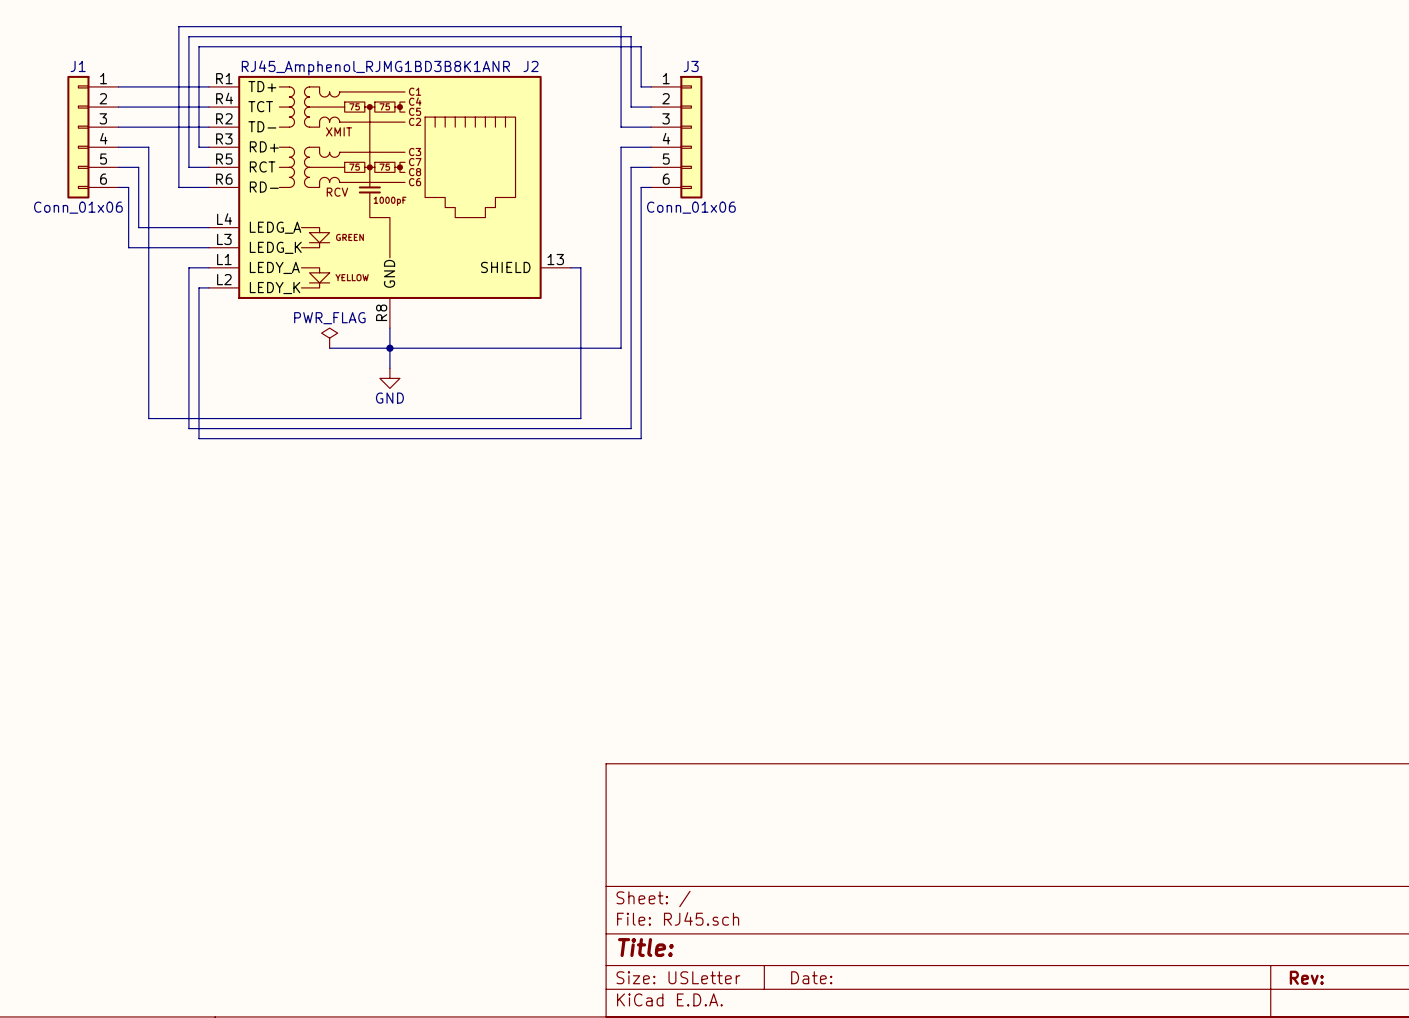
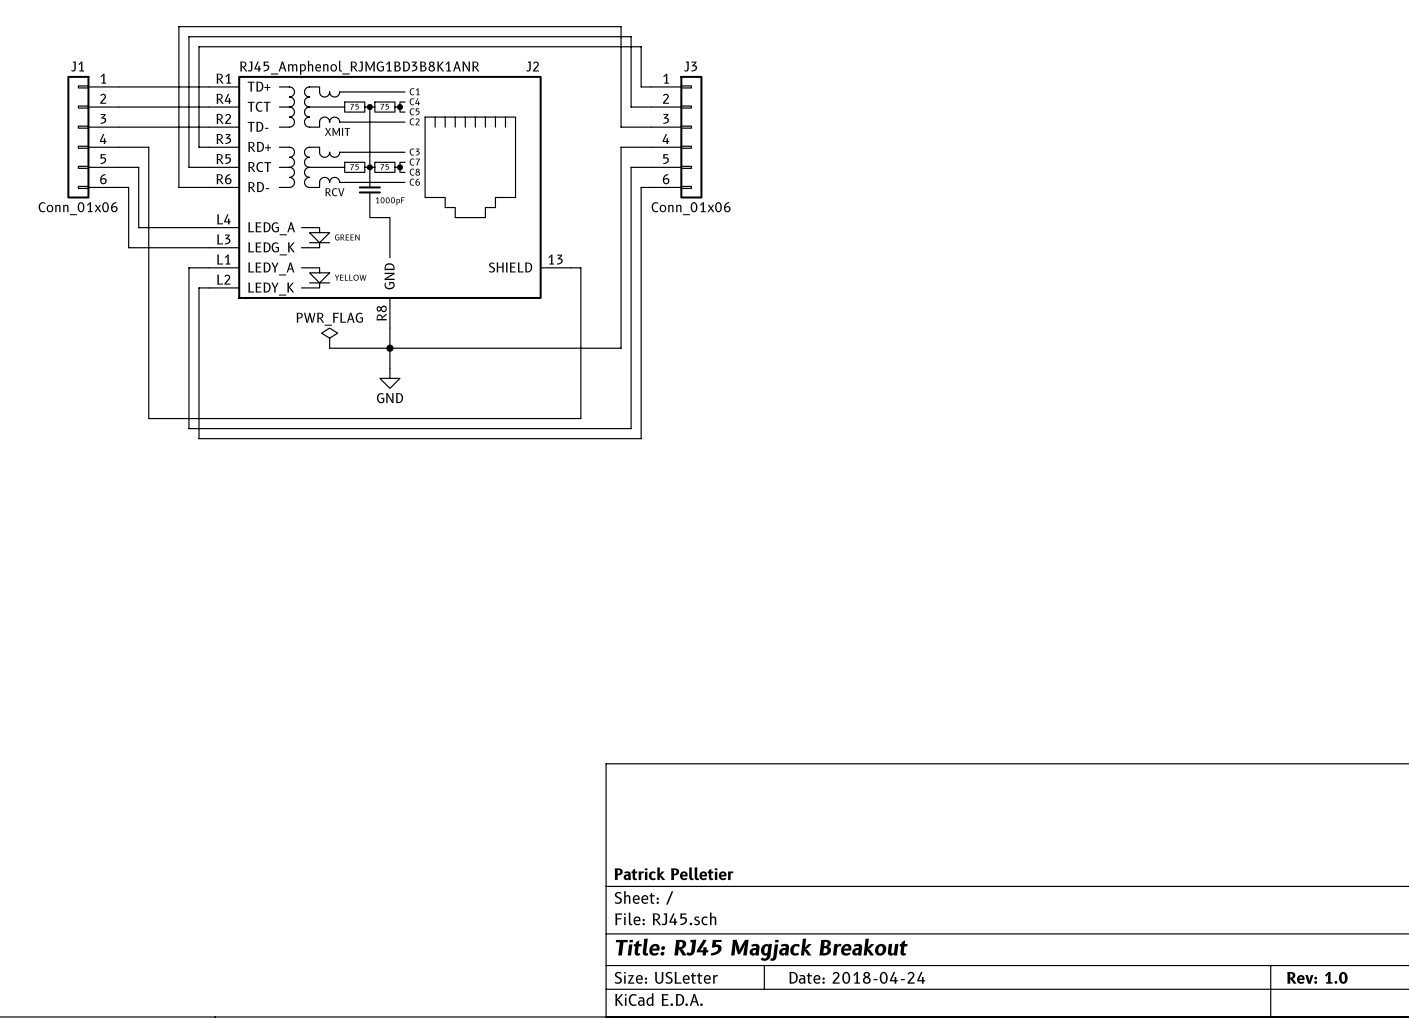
title block: none -> Patrick Pelletier (673, 873)
title block: Title: (645, 947) -> Title: RJ45 Magjack Breakout (761, 949)
title block: Date: (811, 977) -> Date: 2018-04-24 (857, 977)
title block: Rev: (1306, 977) -> Rev: 1.0 (1317, 977)

